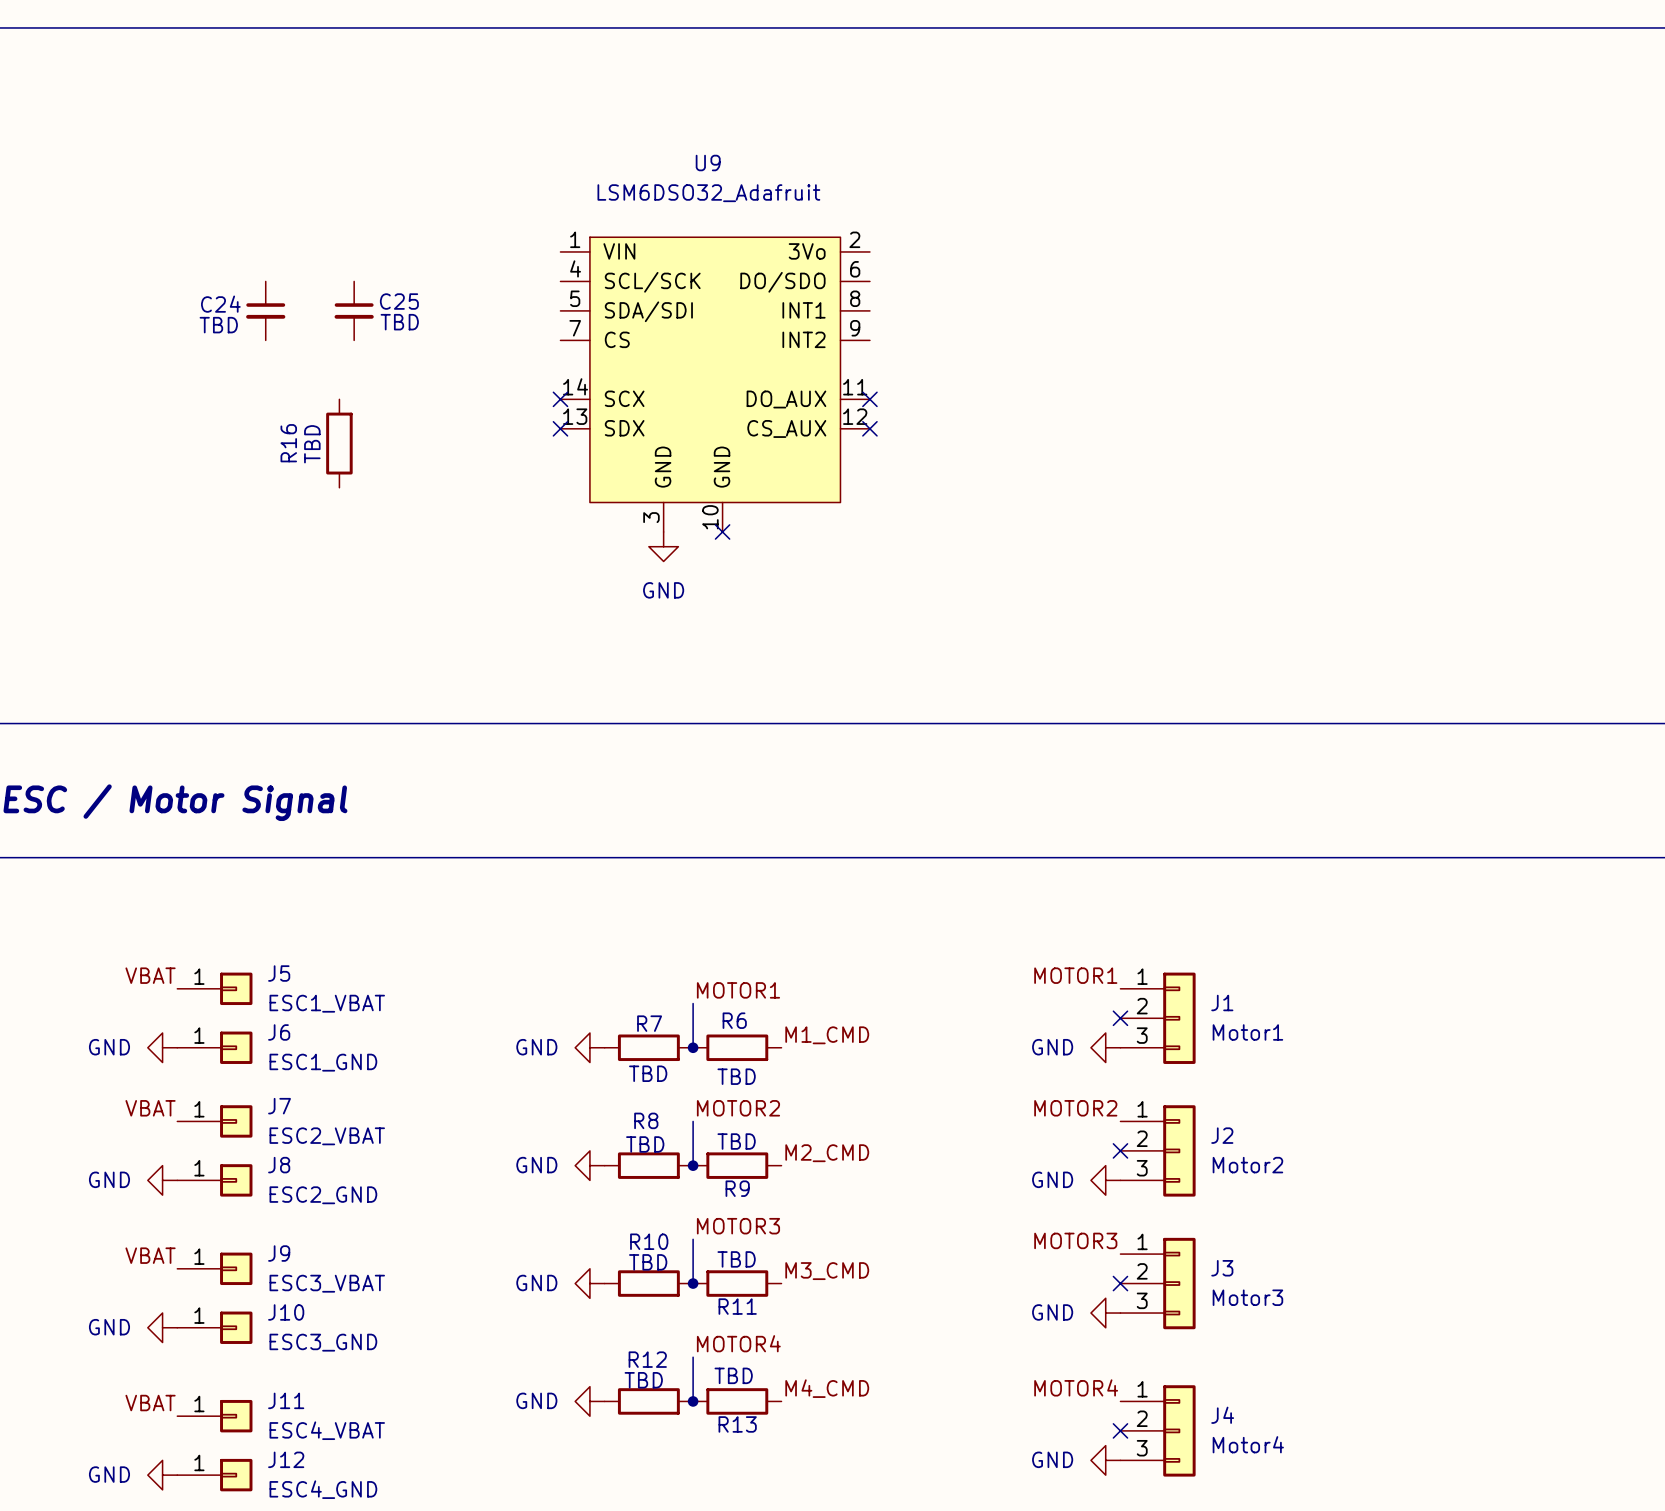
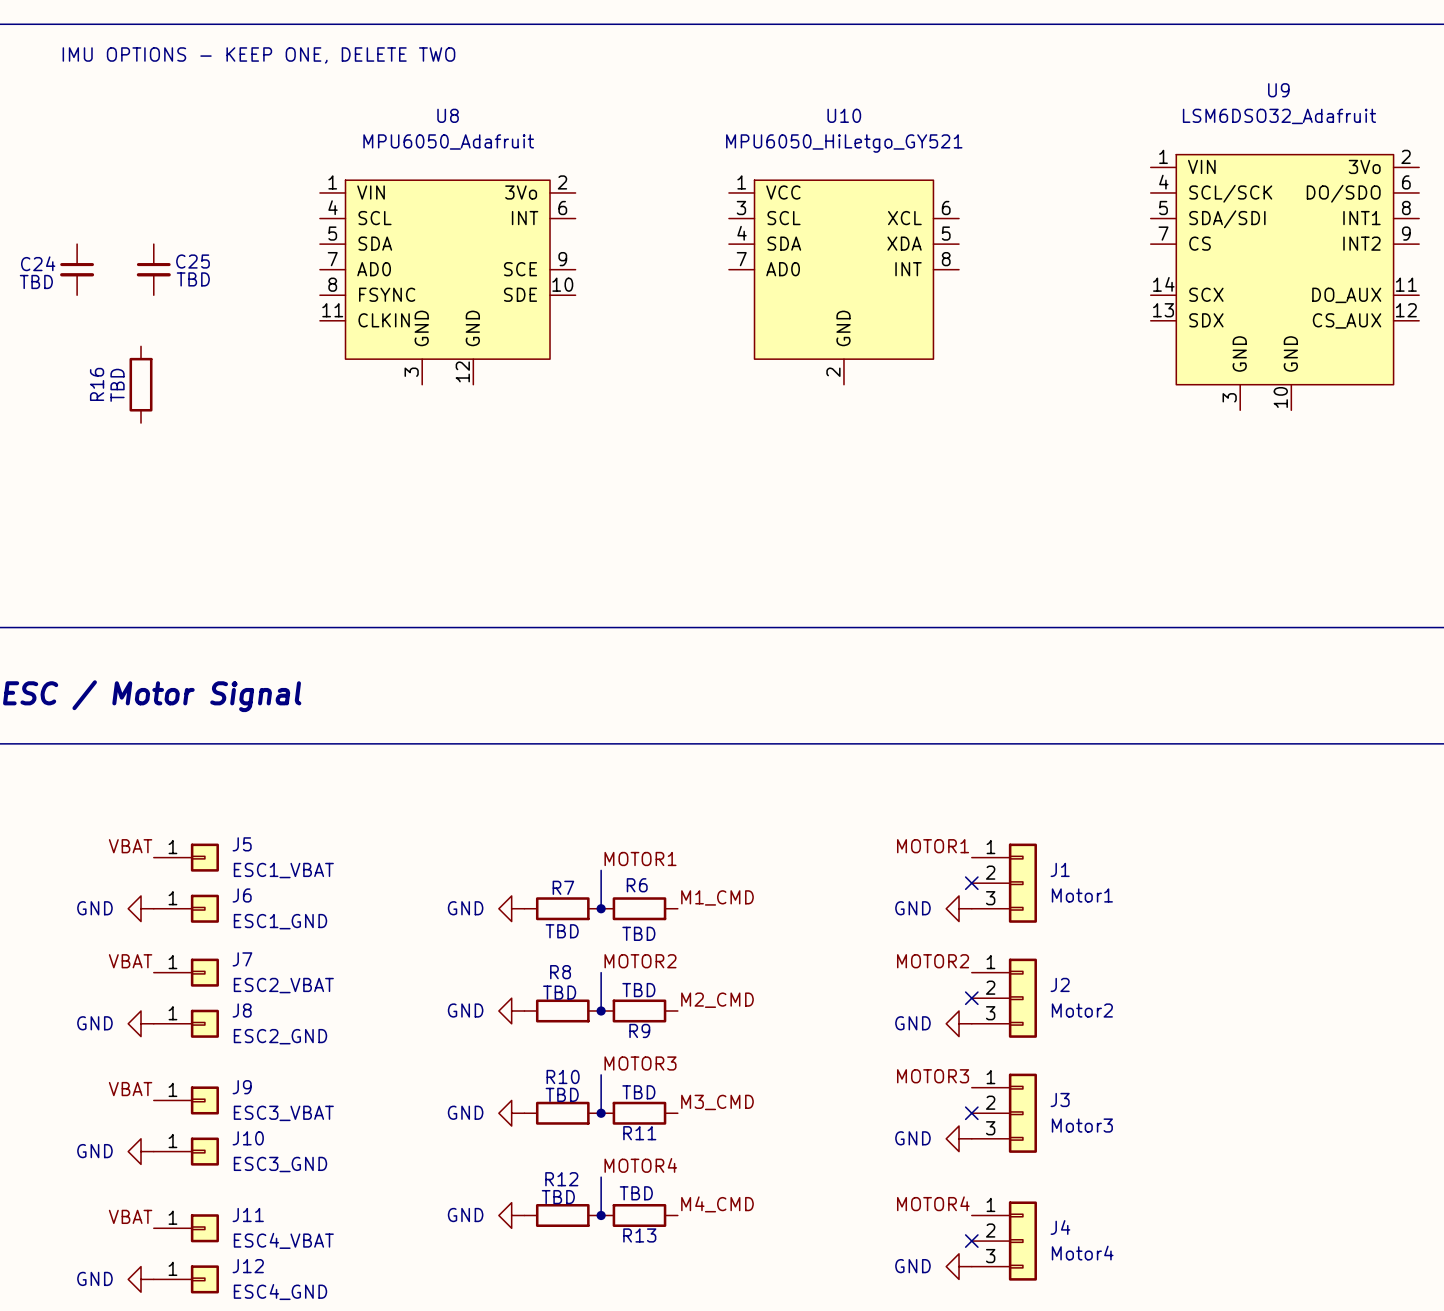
text: none -> IMU OPTIONS - KEEP ONE, DELETE TWO (258, 55)
C24 position: (265, 310) -> (77, 269)
C25 position: (354, 310) -> (153, 269)
U8: none -> MPU6050_Adafruit (447, 282)
U10: none -> MPU6050_HiLetgo_GY521 (843, 282)
U9 position: (715, 384) -> (1284, 282)
no-connect mark: (560, 399) -> none
no-connect mark: (869, 399) -> none
no-connect mark: (560, 428) -> none
no-connect mark: (869, 428) -> none
R16 position: (339, 443) -> (141, 384)
no-connect mark: (722, 531) -> none
power symbol: GND (663, 546) -> none

